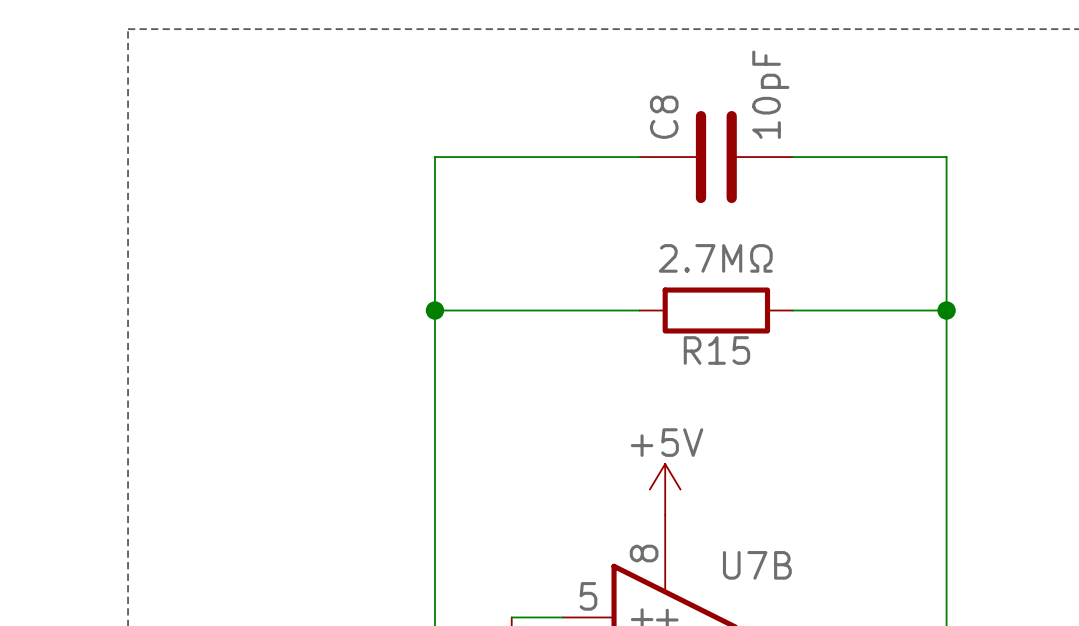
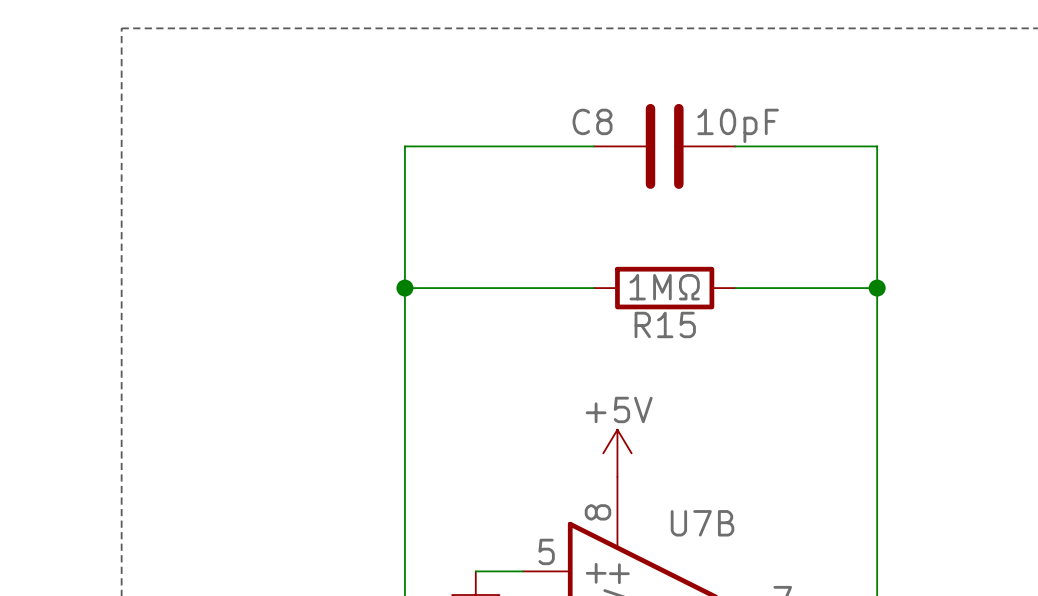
C8 value rotation: 0° (770, 94) -> 90° clockwise (738, 125)
C8 name rotation: 0° (664, 117) -> 90° clockwise (592, 121)
R15 value: 2.7MΩ (715, 258) -> 1MΩ (664, 287)

